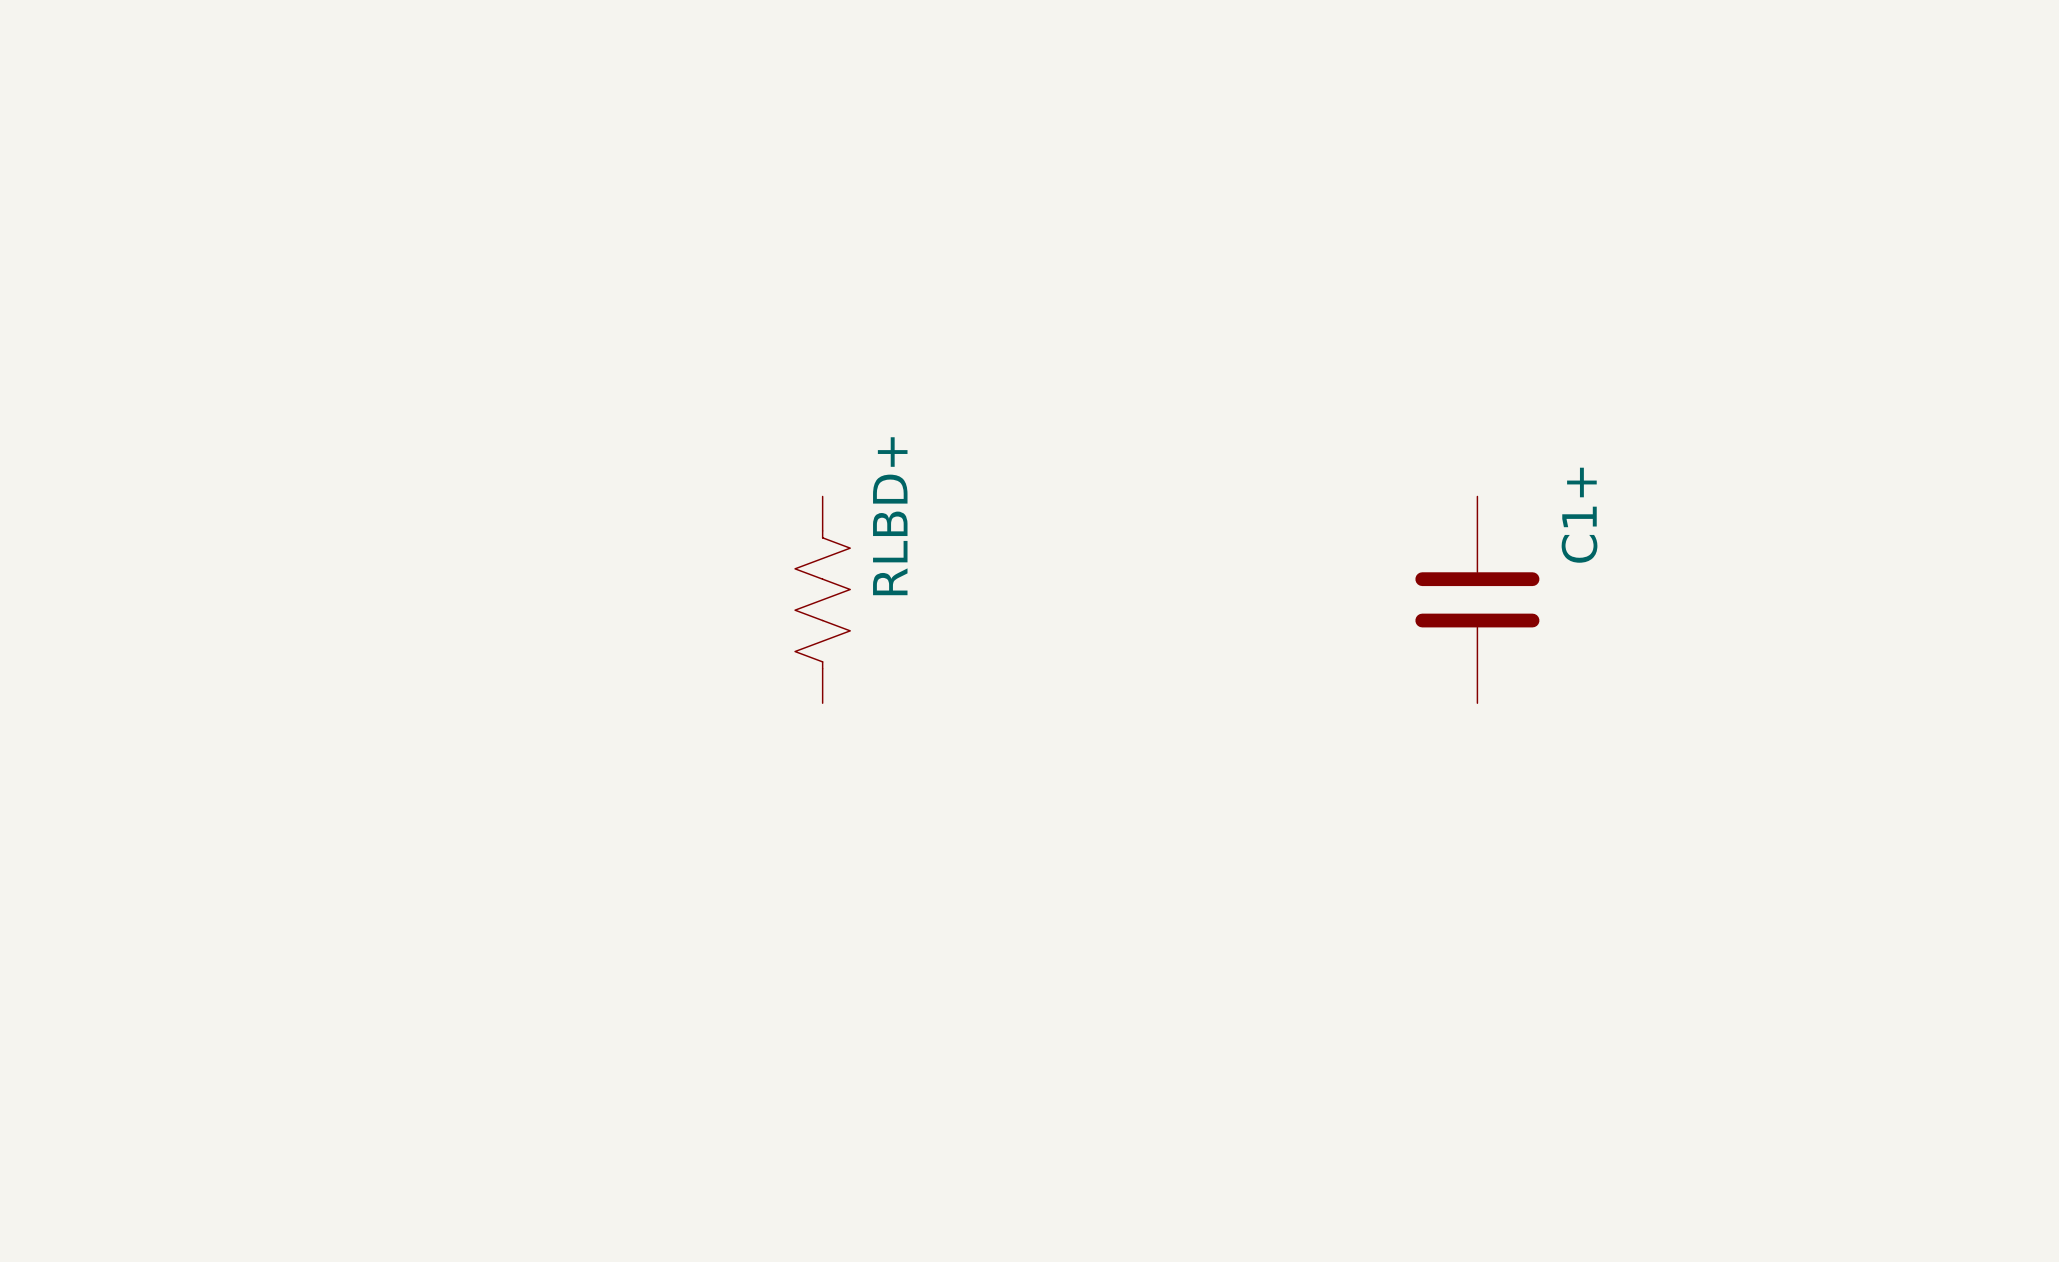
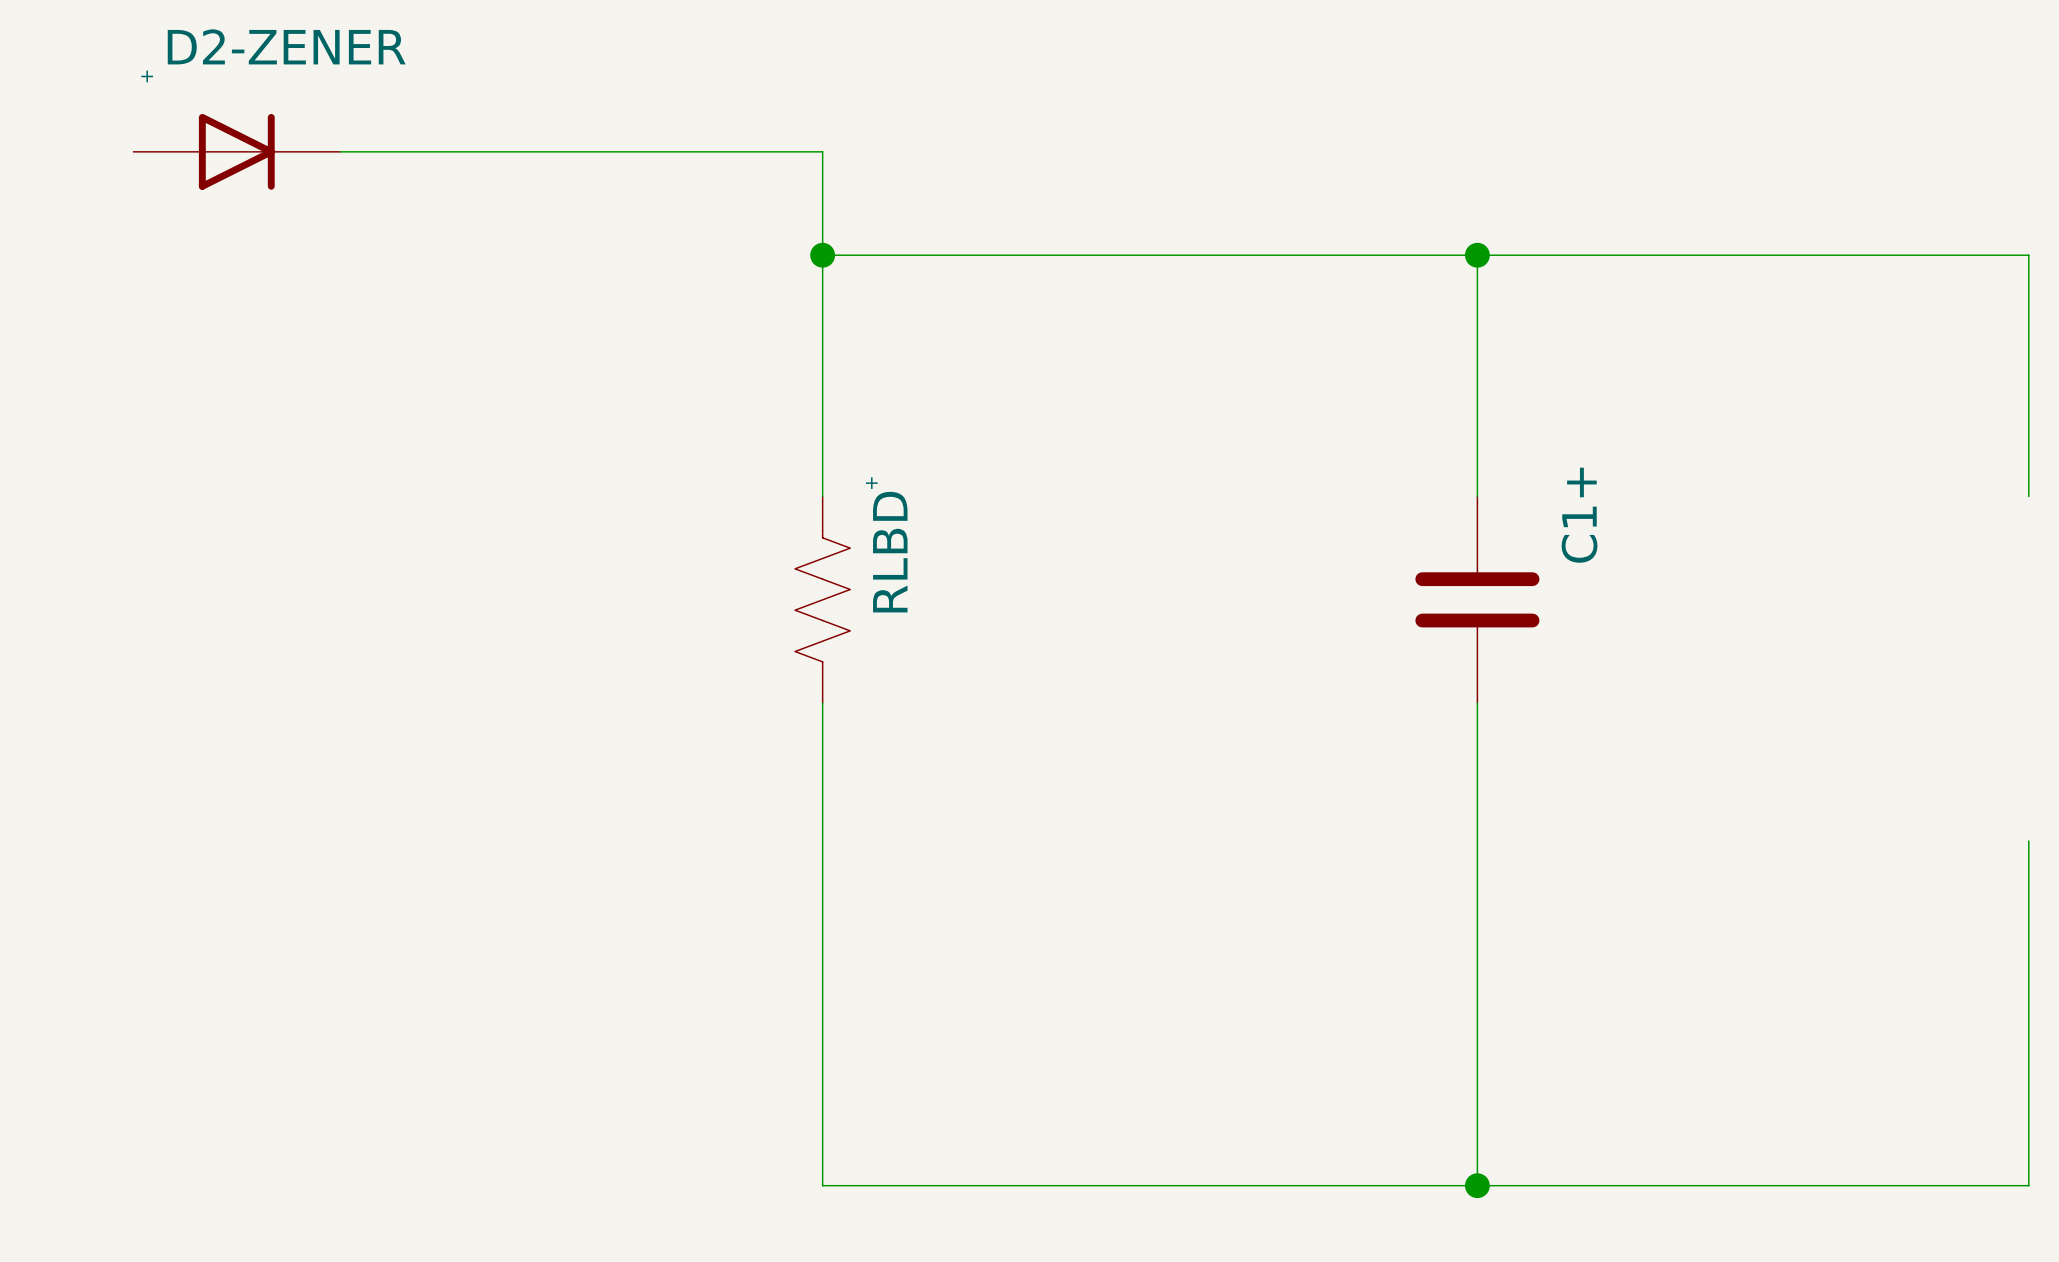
part: none -> D2-ZENER (236, 151)
wire: none -> (340, 151) (822, 151) (822, 496)
wire: none -> (822, 255) (2028, 255) (2028, 496)
junction: none -> (822, 255)
wire: none -> (1477, 255) (1477, 496)
junction: none -> (1477, 255)
part name: none -> + (871, 483)
part value: RLBD+ (890, 516) -> RLBD (890, 552)
wire: none -> (822, 703) (822, 1185) (2028, 1185) (2028, 841)
wire: none -> (1477, 703) (1477, 1185)
junction: none -> (1477, 1185)

